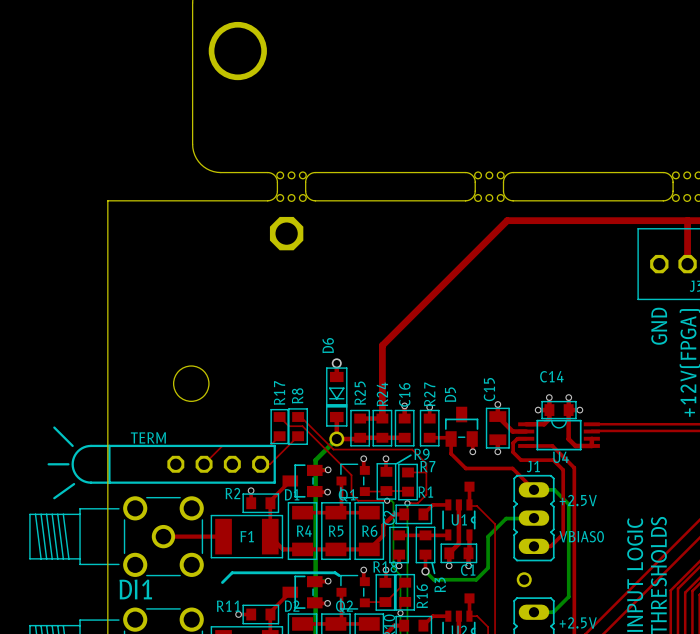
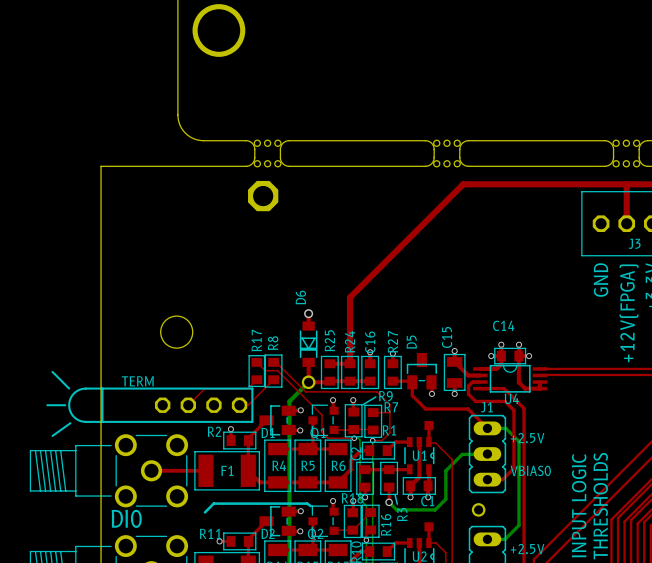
D6 footprint: [326, 367, 348, 427] -> [299, 321, 318, 367]
DI1 name: DI1 (135, 589) -> DI0 (126, 518)

